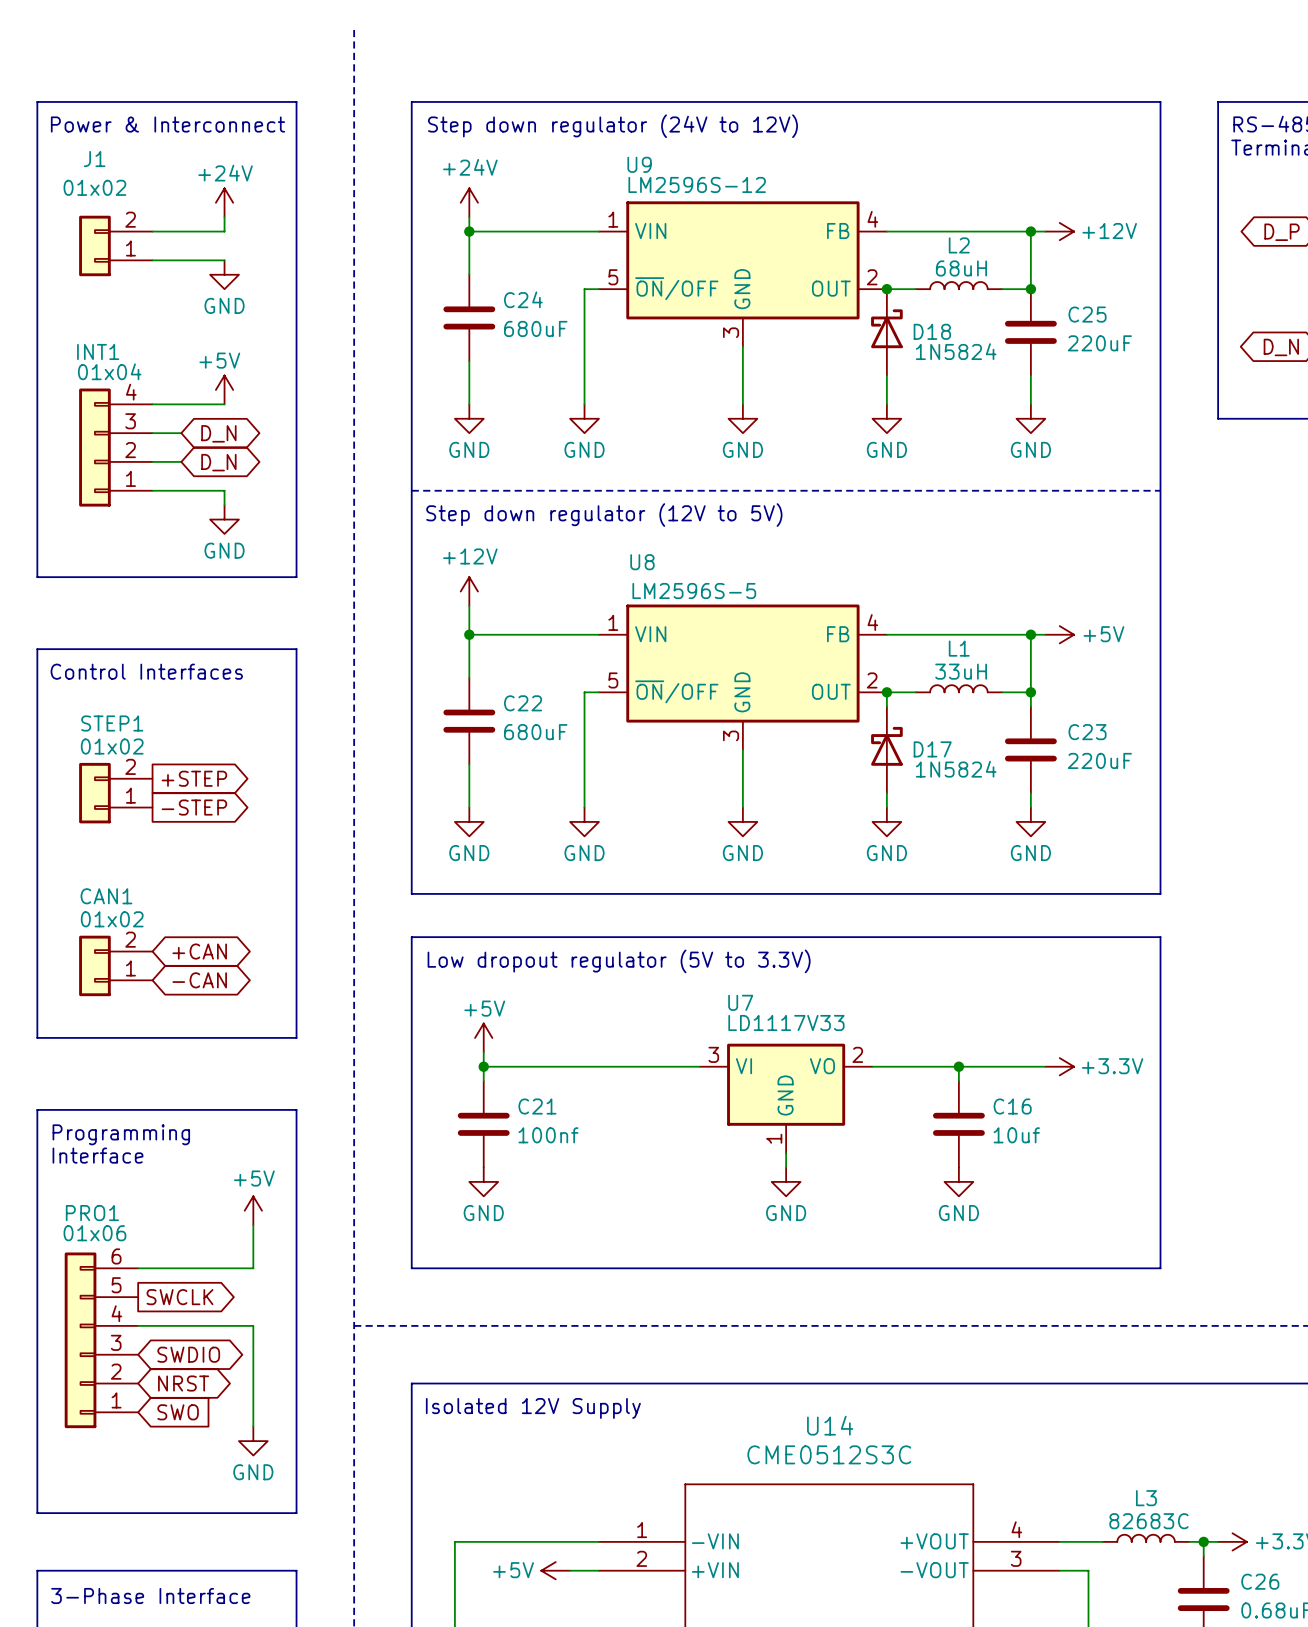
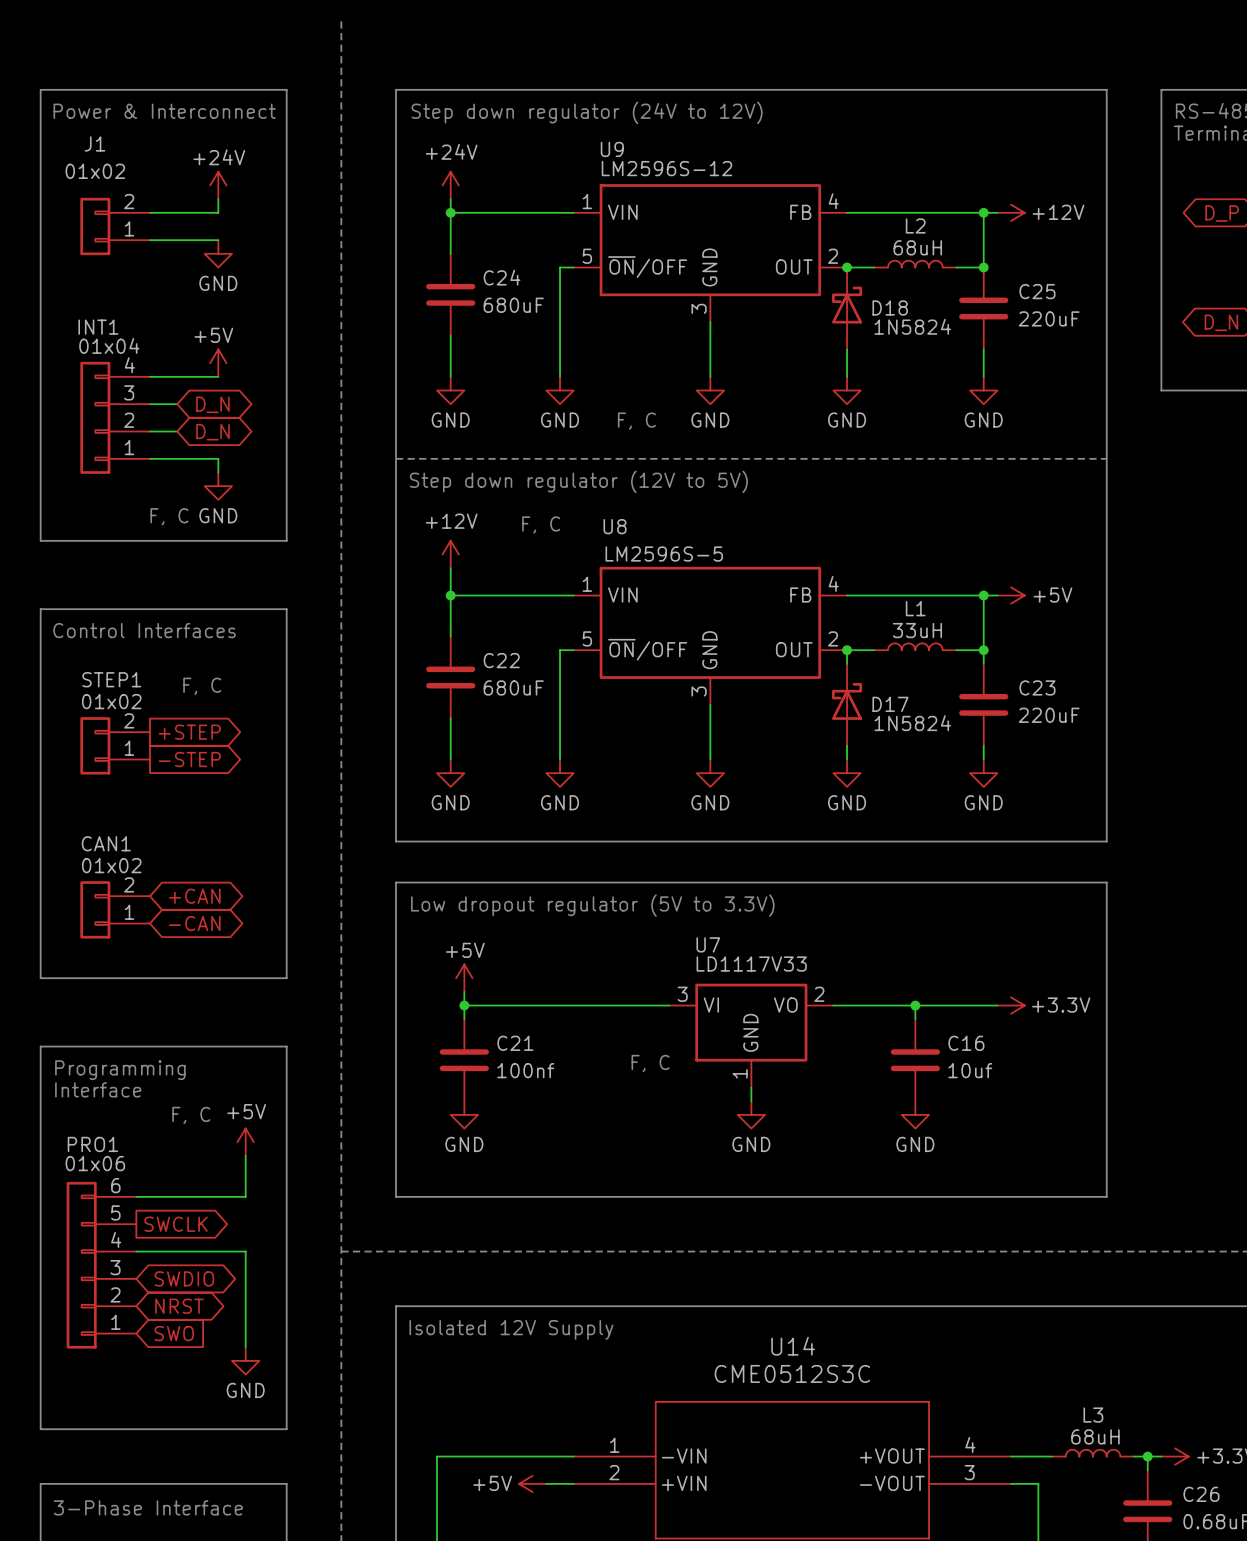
text: none -> F, C (636, 421)
text: none -> F, C (169, 516)
text: none -> F, C (541, 524)
text: none -> F, C (202, 686)
text: none -> F, C (650, 1063)
text: none -> F, C (191, 1115)
L3 value: 82683C (1148, 1521) -> 68uH (1095, 1436)

